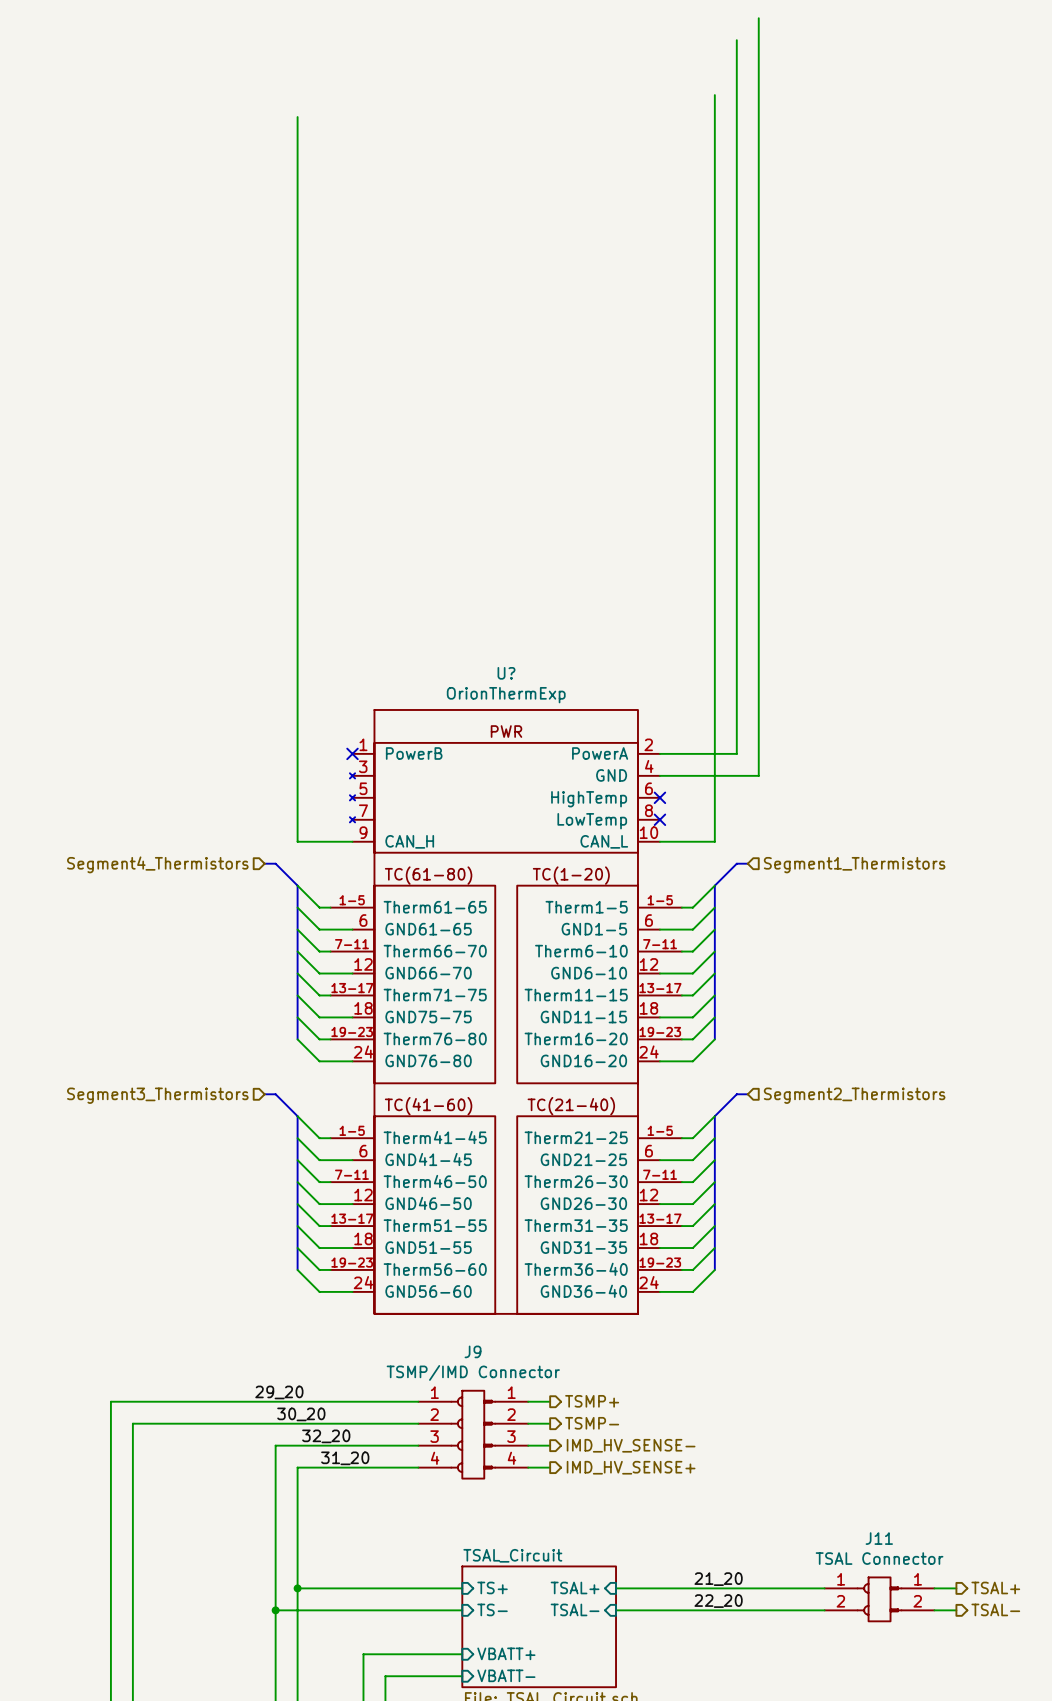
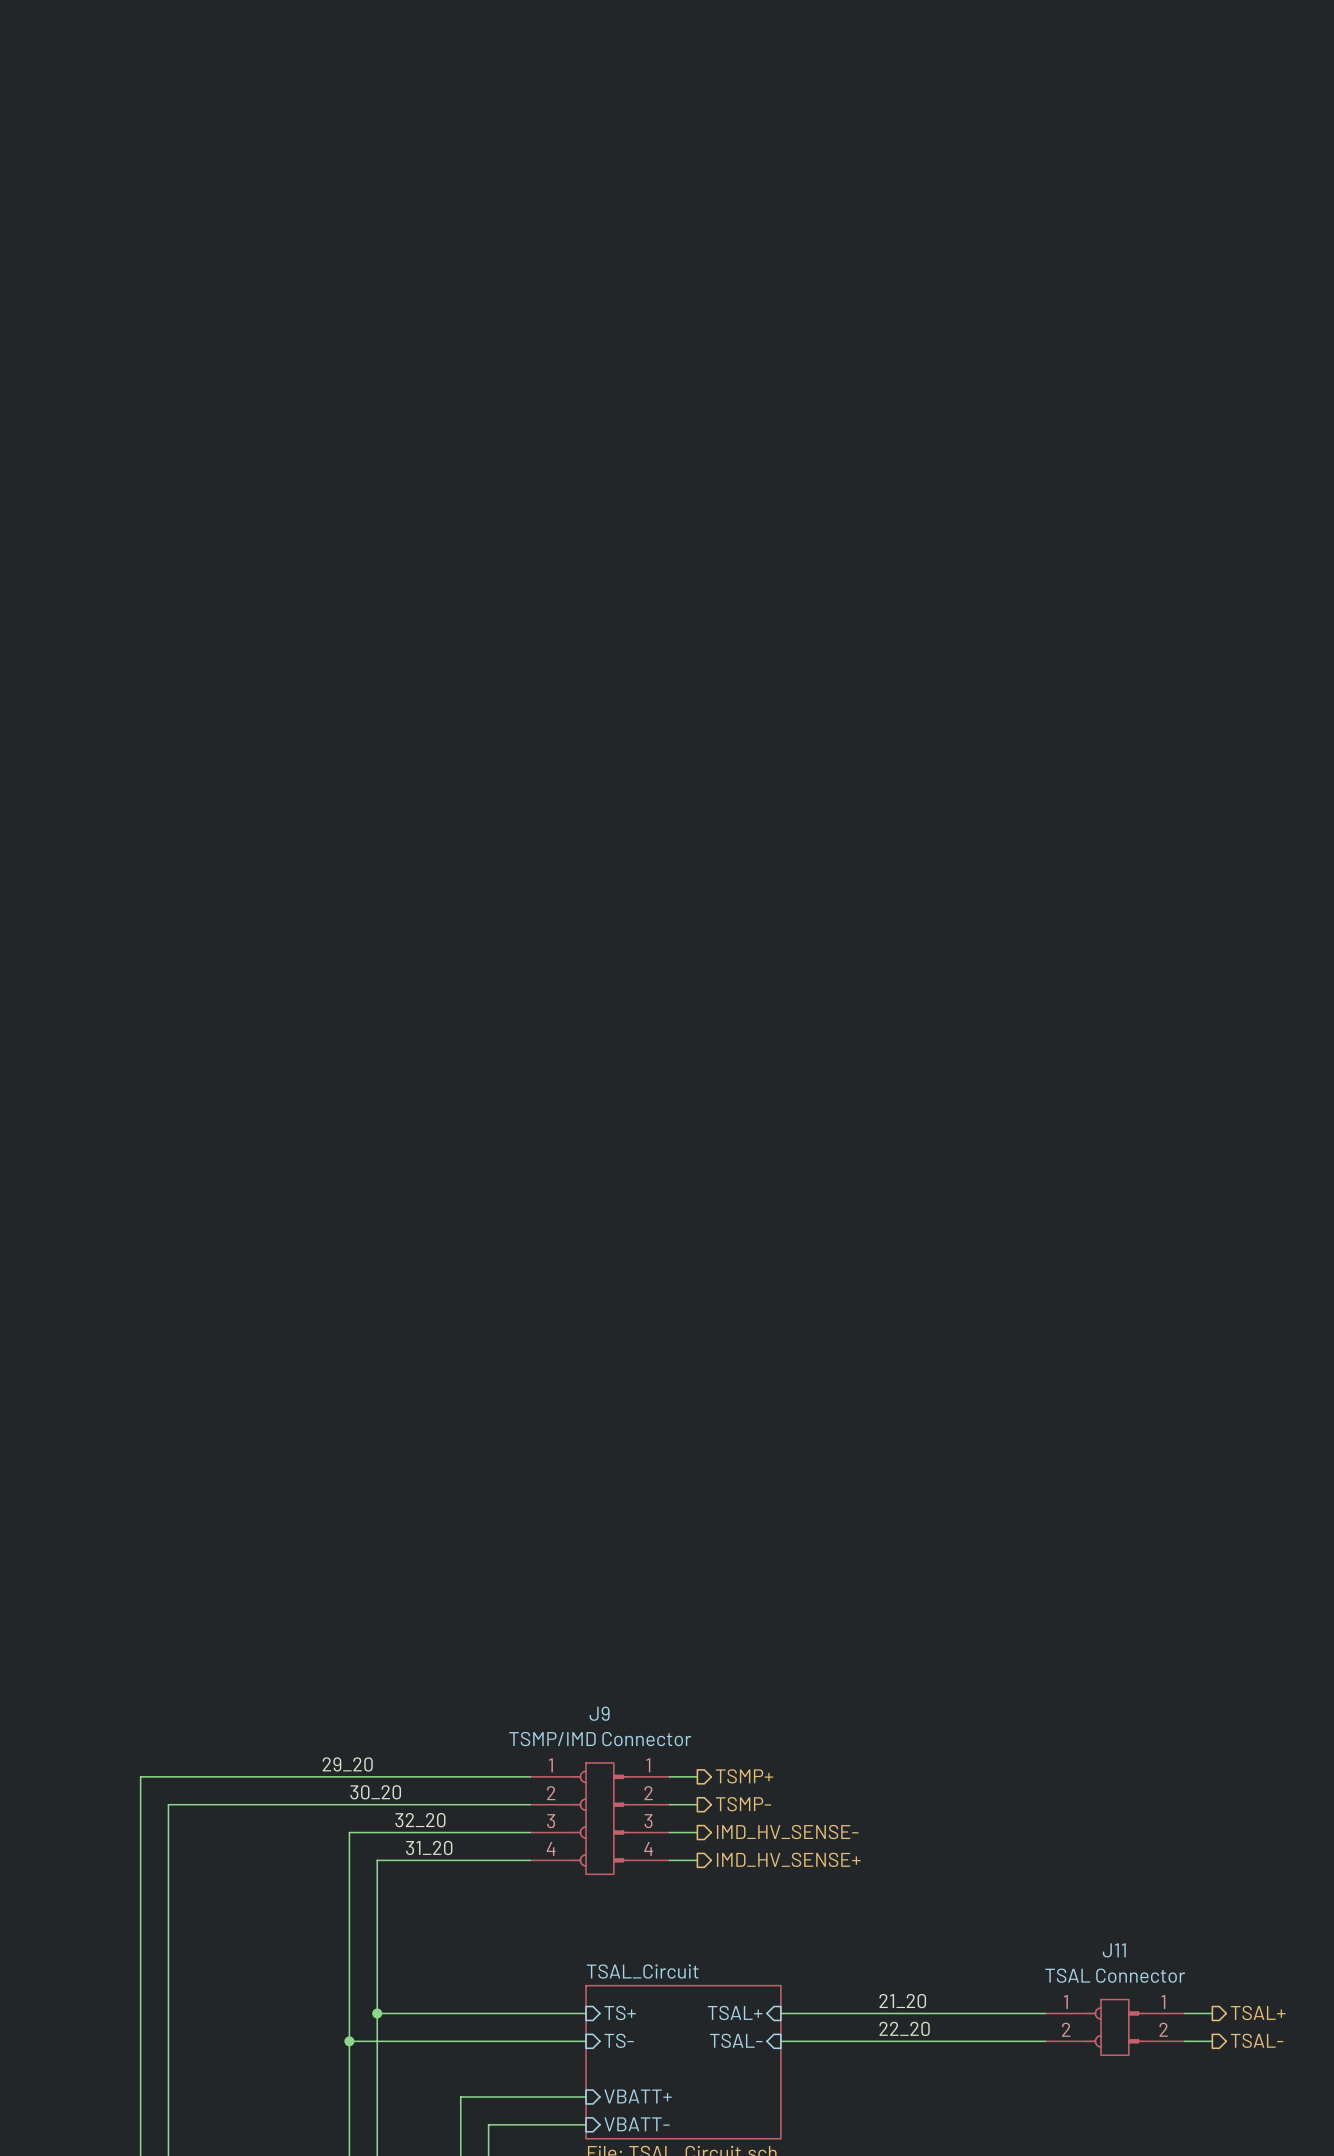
wire: (758, 18) (758, 775) (659, 775) -> none
wire: (736, 40) (736, 753) (659, 753) -> none
wire: (714, 95) (714, 841) (659, 841) -> none
wire: (297, 117) (297, 841) (352, 841) -> none
no-connect mark: (352, 753) -> none
no-connect mark: (659, 797) -> none
no-connect mark: (659, 819) -> none
bus: (264, 863) (275, 863) (297, 885) (297, 1039) -> none
bus: (747, 863) (736, 863) (714, 885) (714, 1039) -> none
hierarchical label: Segment4_Thermistors (157, 864) -> none
hierarchical label: Segment1_Thermistors (854, 865) -> none
wire: (297, 885) (319, 907) (330, 907) -> none
wire: (714, 885) (692, 907) (681, 907) -> none
wire: (297, 907) (319, 929) (352, 929) -> none
wire: (714, 907) (692, 929) (659, 929) -> none
wire: (297, 929) (319, 951) (330, 951) -> none
wire: (714, 929) (692, 951) (681, 951) -> none
wire: (297, 951) (319, 973) (352, 973) -> none
wire: (714, 951) (692, 973) (659, 973) -> none
wire: (297, 973) (319, 995) (330, 995) -> none
wire: (714, 973) (692, 995) (681, 995) -> none
wire: (297, 995) (319, 1017) (352, 1017) -> none
wire: (714, 995) (692, 1017) (659, 1017) -> none
U?: OrionThermExp (506, 1011) -> none
wire: (297, 1017) (319, 1039) (330, 1039) -> none
wire: (714, 1017) (692, 1039) (681, 1039) -> none
wire: (297, 1039) (319, 1061) (352, 1061) -> none
wire: (714, 1039) (692, 1061) (659, 1061) -> none
bus: (264, 1094) (275, 1094) (297, 1116) (297, 1269) -> none
bus: (747, 1094) (736, 1094) (714, 1116) (714, 1269) -> none
hierarchical label: Segment3_Thermistors (157, 1095) -> none
hierarchical label: Segment2_Thermistors (854, 1095) -> none
wire: (297, 1116) (319, 1138) (330, 1138) -> none
wire: (714, 1116) (692, 1138) (681, 1138) -> none
wire: (297, 1138) (319, 1160) (352, 1160) -> none
wire: (714, 1138) (692, 1160) (659, 1160) -> none
wire: (297, 1160) (319, 1182) (330, 1182) -> none
wire: (714, 1160) (692, 1182) (681, 1182) -> none
wire: (297, 1182) (319, 1204) (352, 1204) -> none
wire: (714, 1182) (692, 1204) (659, 1204) -> none
wire: (297, 1204) (319, 1226) (330, 1226) -> none
wire: (714, 1204) (692, 1226) (681, 1226) -> none
wire: (297, 1226) (319, 1248) (352, 1248) -> none
wire: (714, 1226) (692, 1248) (659, 1248) -> none
wire: (297, 1248) (319, 1269) (330, 1269) -> none
wire: (714, 1248) (692, 1269) (681, 1269) -> none
wire: (297, 1269) (319, 1291) (352, 1291) -> none
wire: (714, 1269) (692, 1291) (659, 1291) -> none

